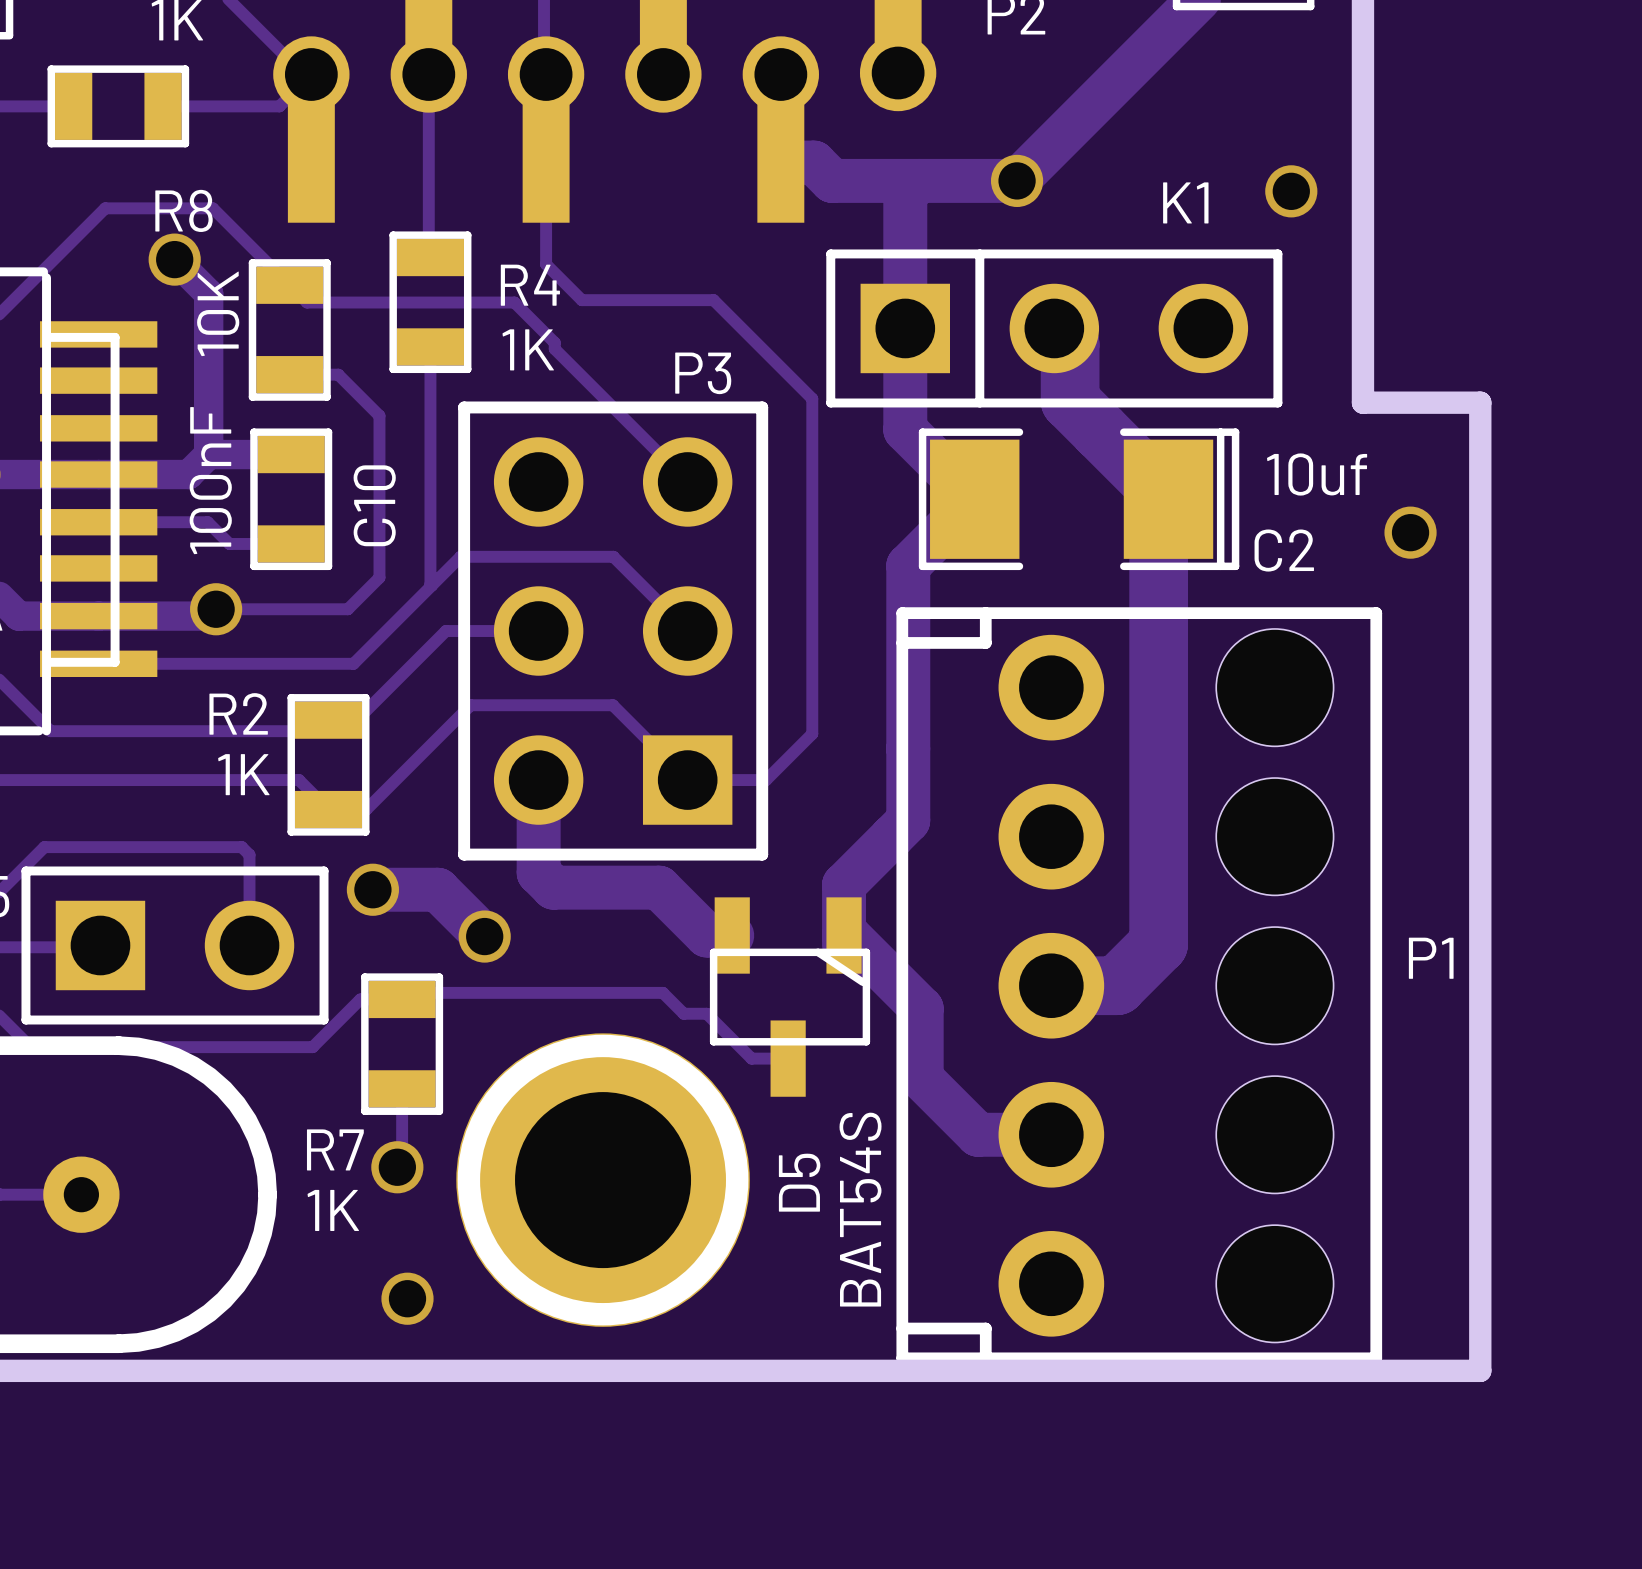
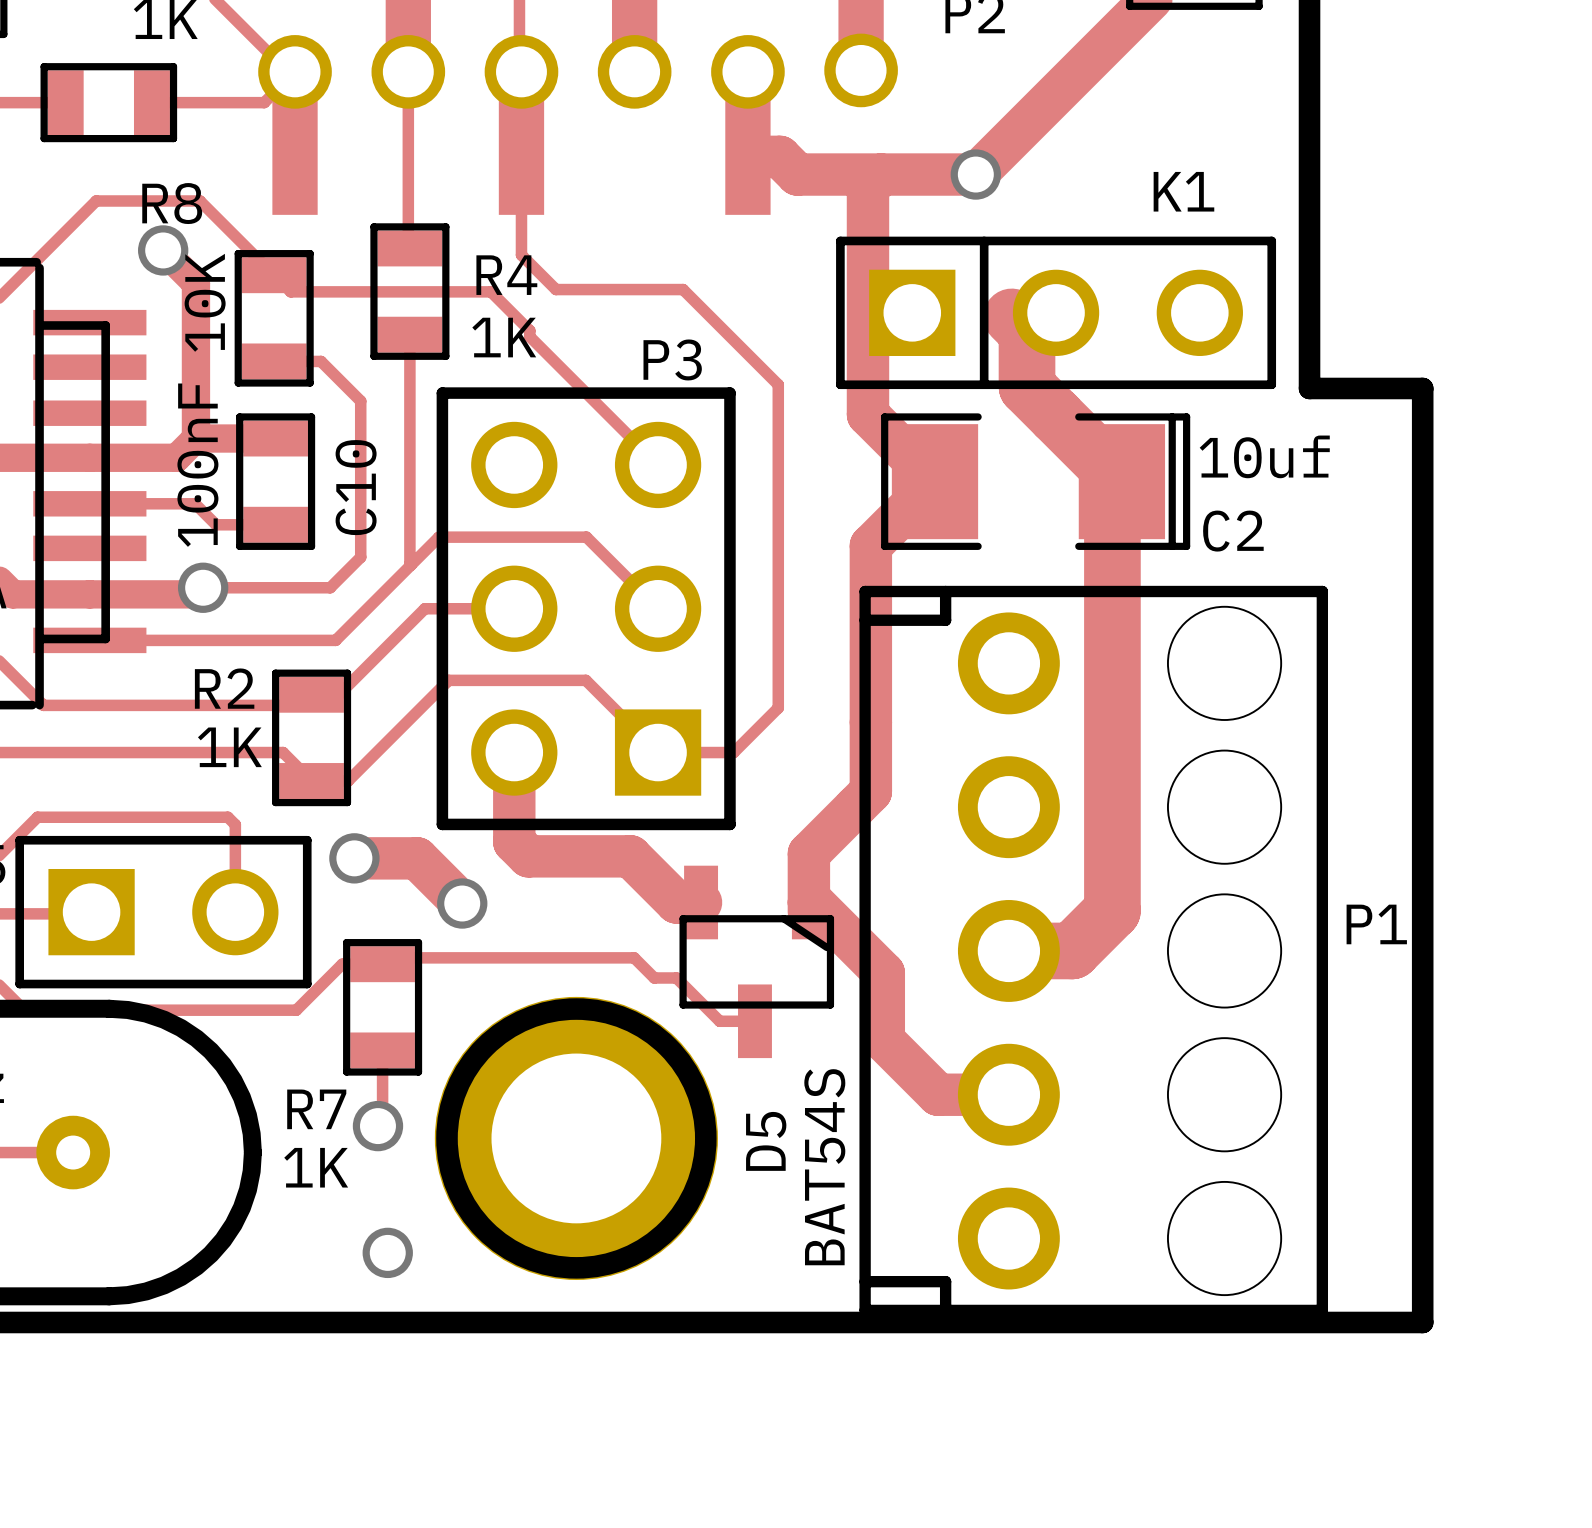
via: (1291, 191) -> none
K1 position: (1054, 328) -> (1056, 312)
via: (1410, 532) -> none

